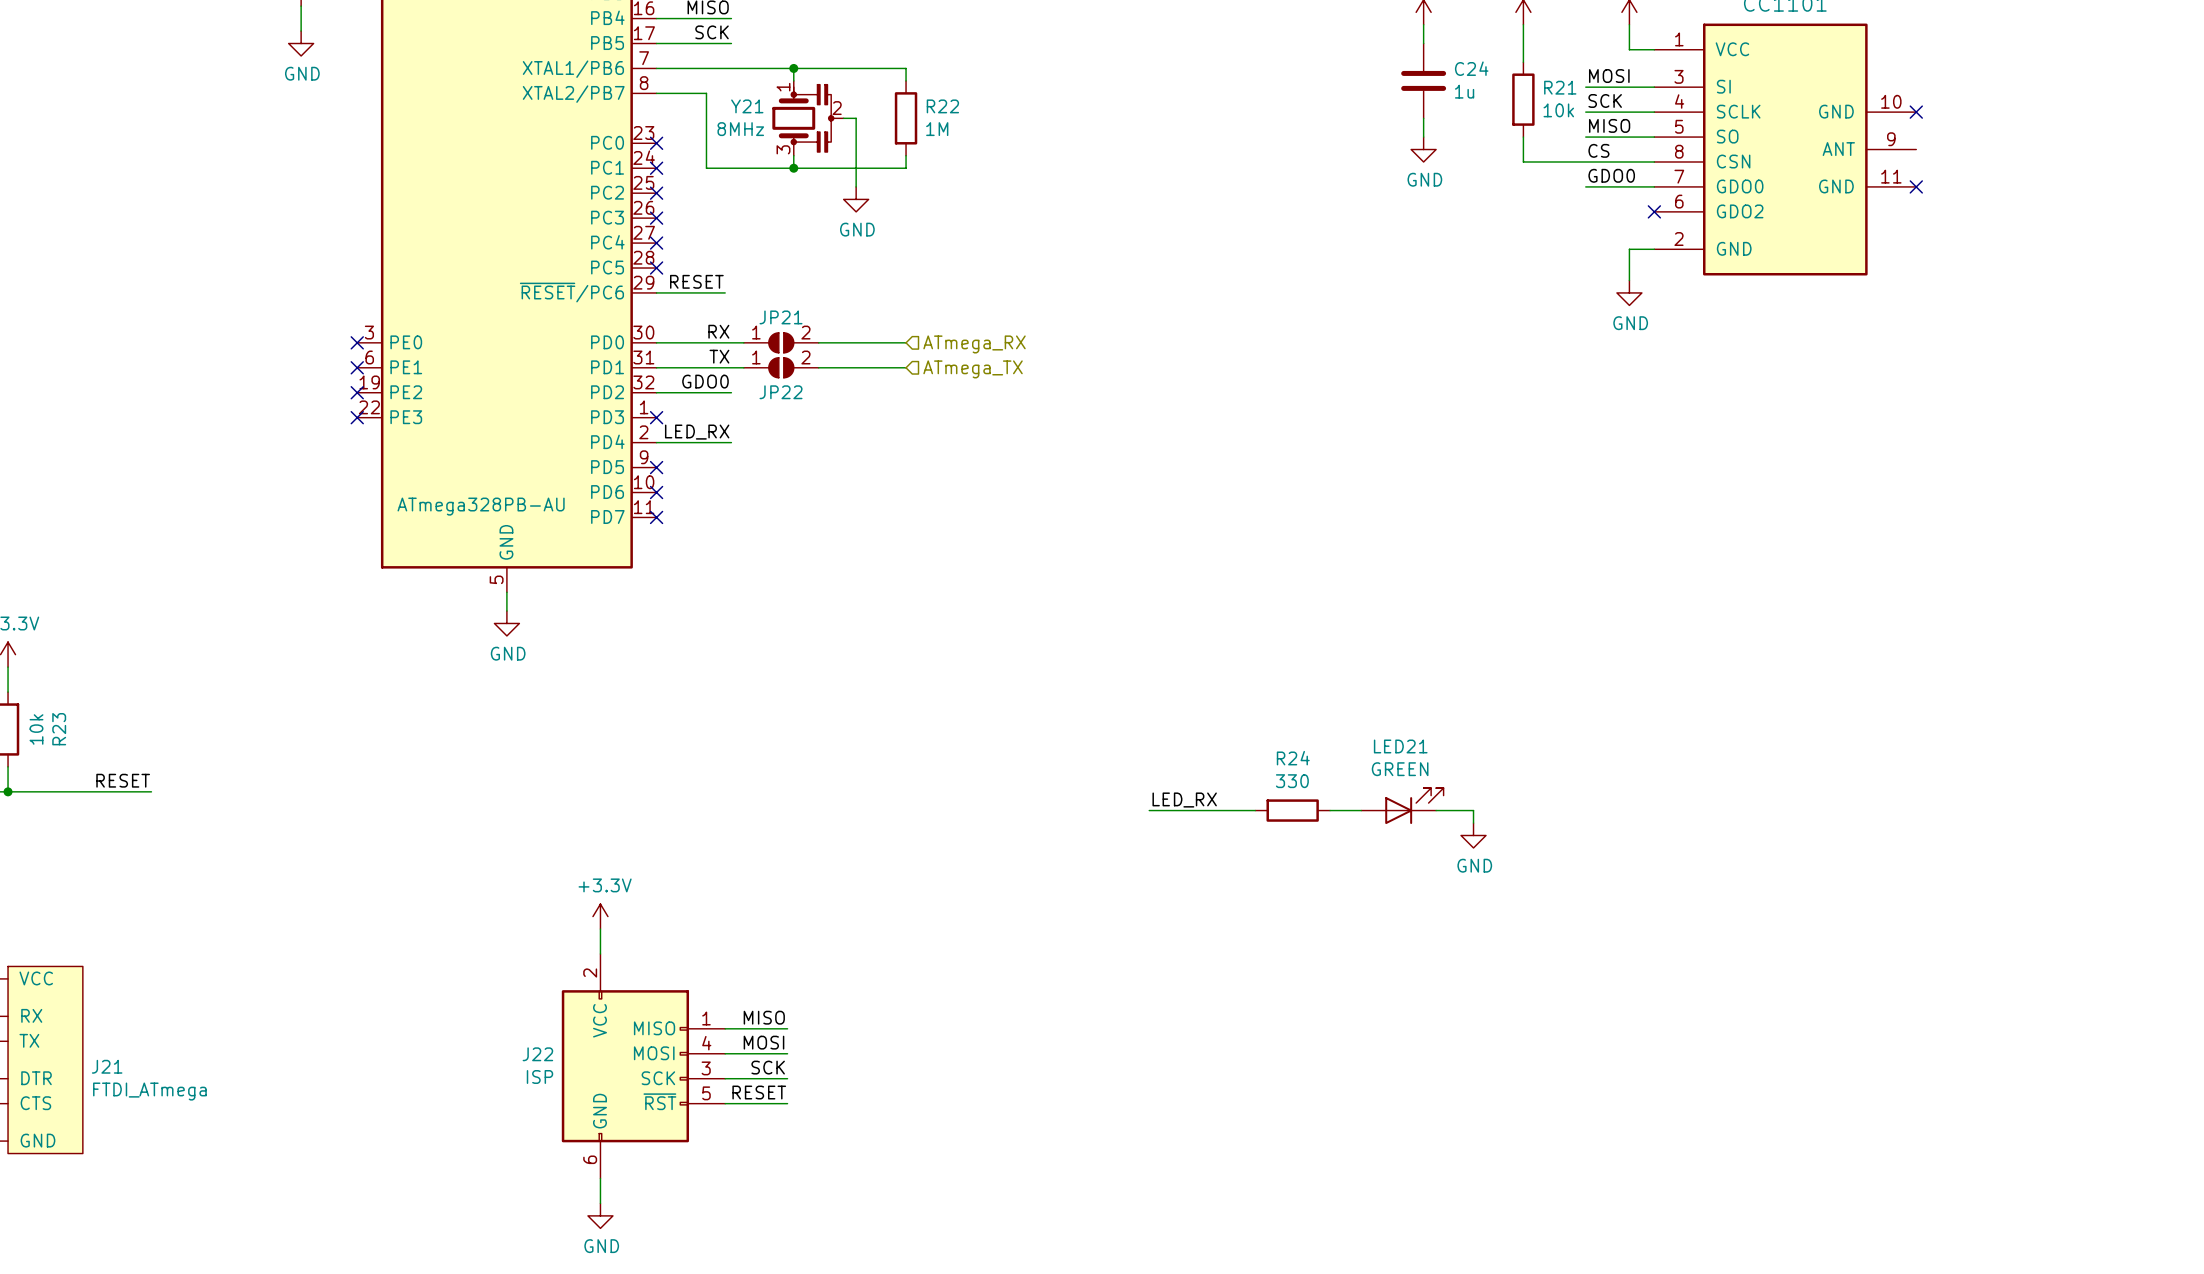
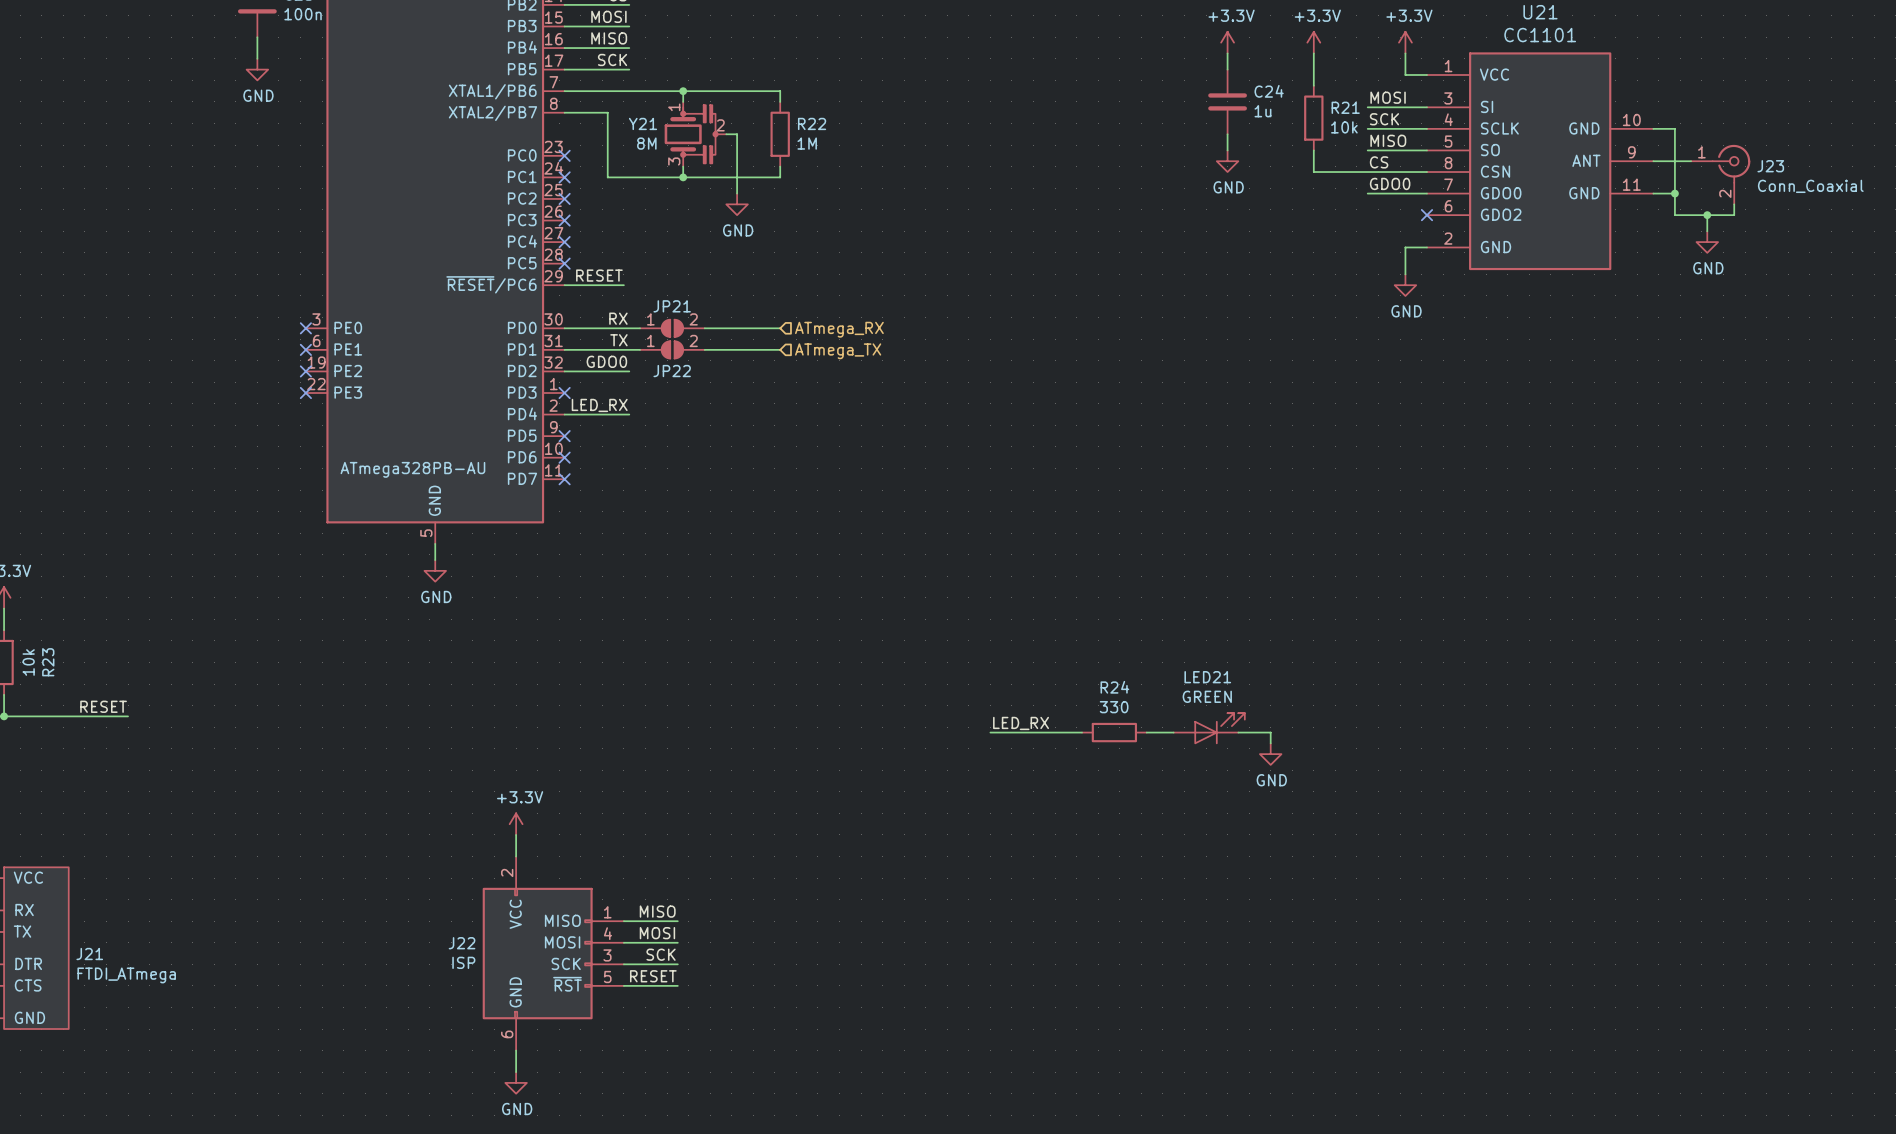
wire: none -> (1653, 128) (1674, 128) (1674, 215) (1734, 215) (1734, 204)
no-connect mark: (1916, 112) -> none
Y21 value: 8MHz (740, 129) -> 8M (646, 143)
wire: none -> (1653, 161) (1691, 161)
J23: none -> Conn_Coaxial (1720, 174)
wire: none -> (1653, 193) (1674, 193)
no-connect mark: (1916, 186) -> none
junction: none -> (1674, 193)
wire: none -> (1707, 215) (1707, 231)
junction: none -> (1707, 215)
power symbol: none -> GND (1707, 242)

